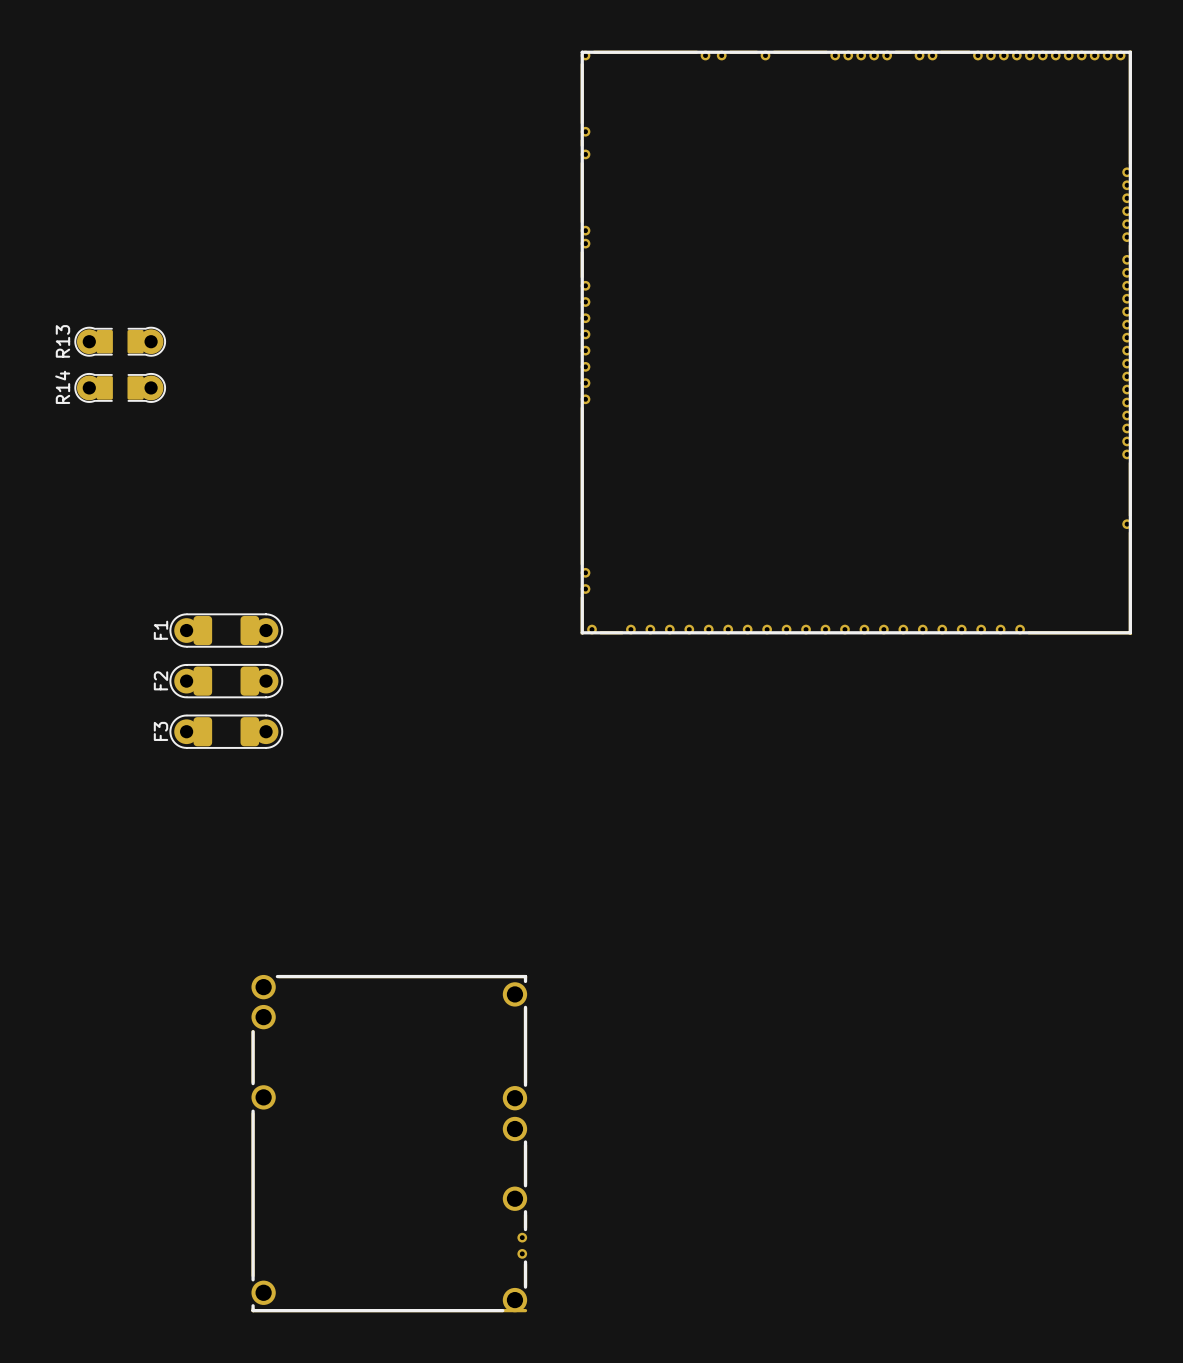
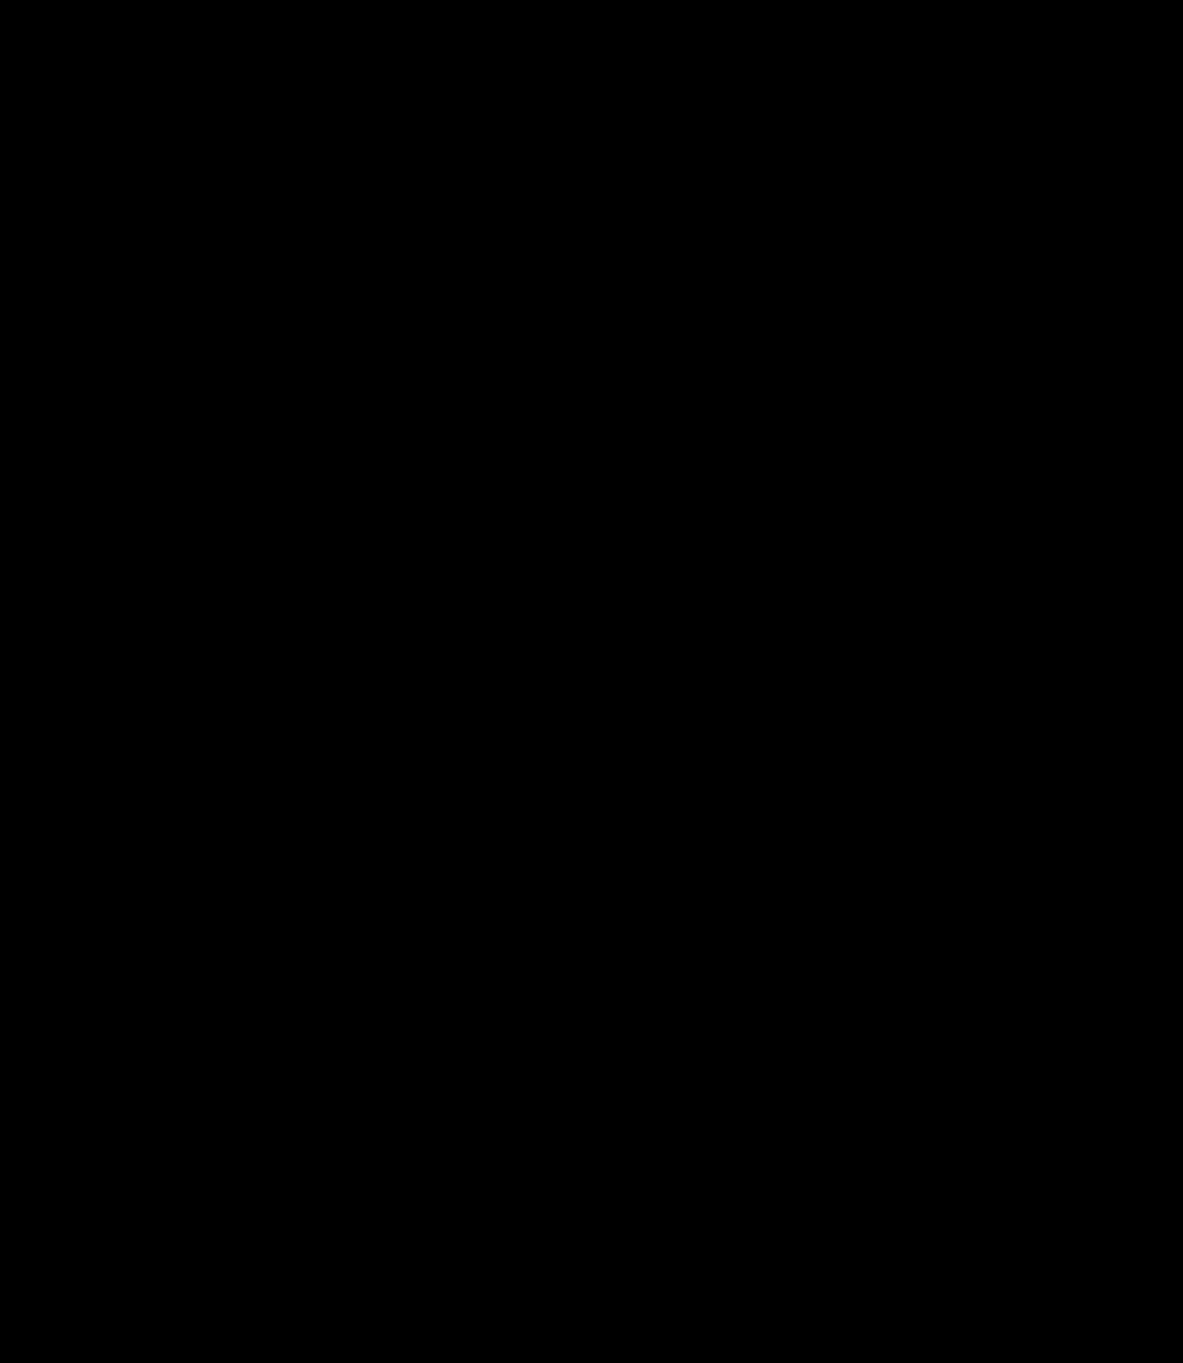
R13: (120, 341) -> none
part: (856, 342) -> none
R14: (120, 387) -> none
F1: (226, 630) -> none
F2: (226, 681) -> none
F3: (226, 731) -> none
part: (389, 1143) -> none

